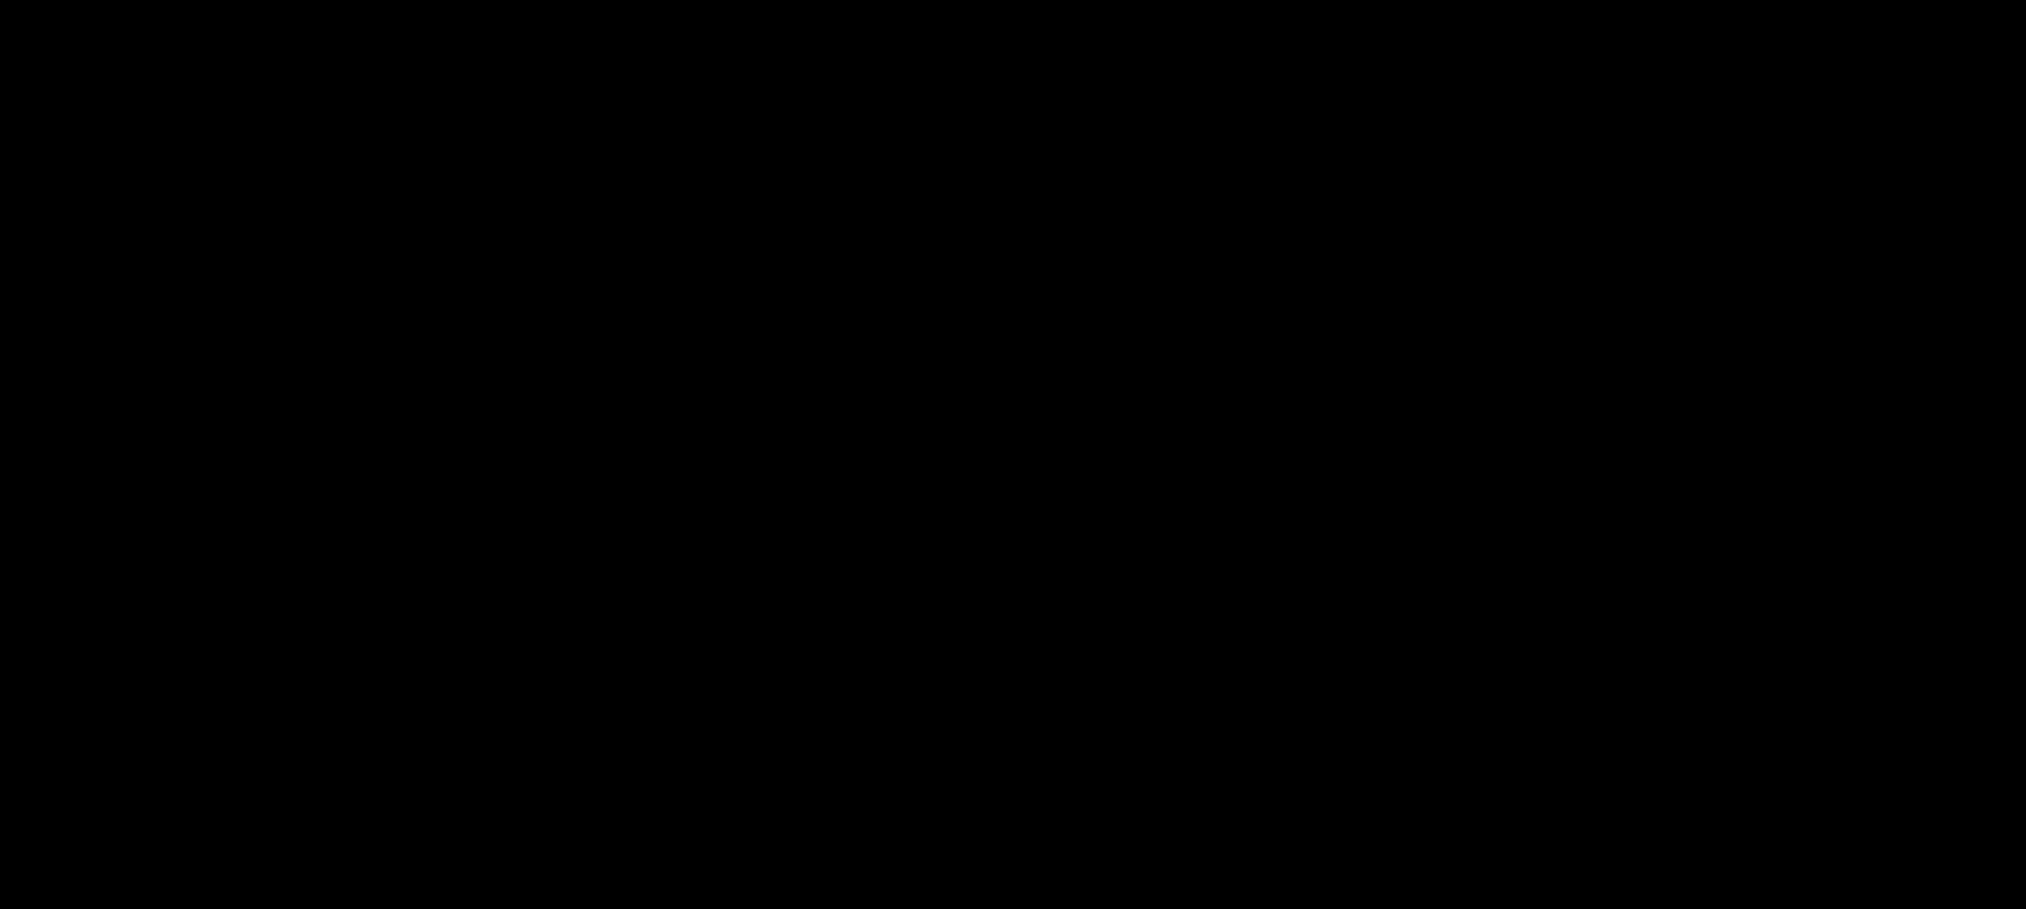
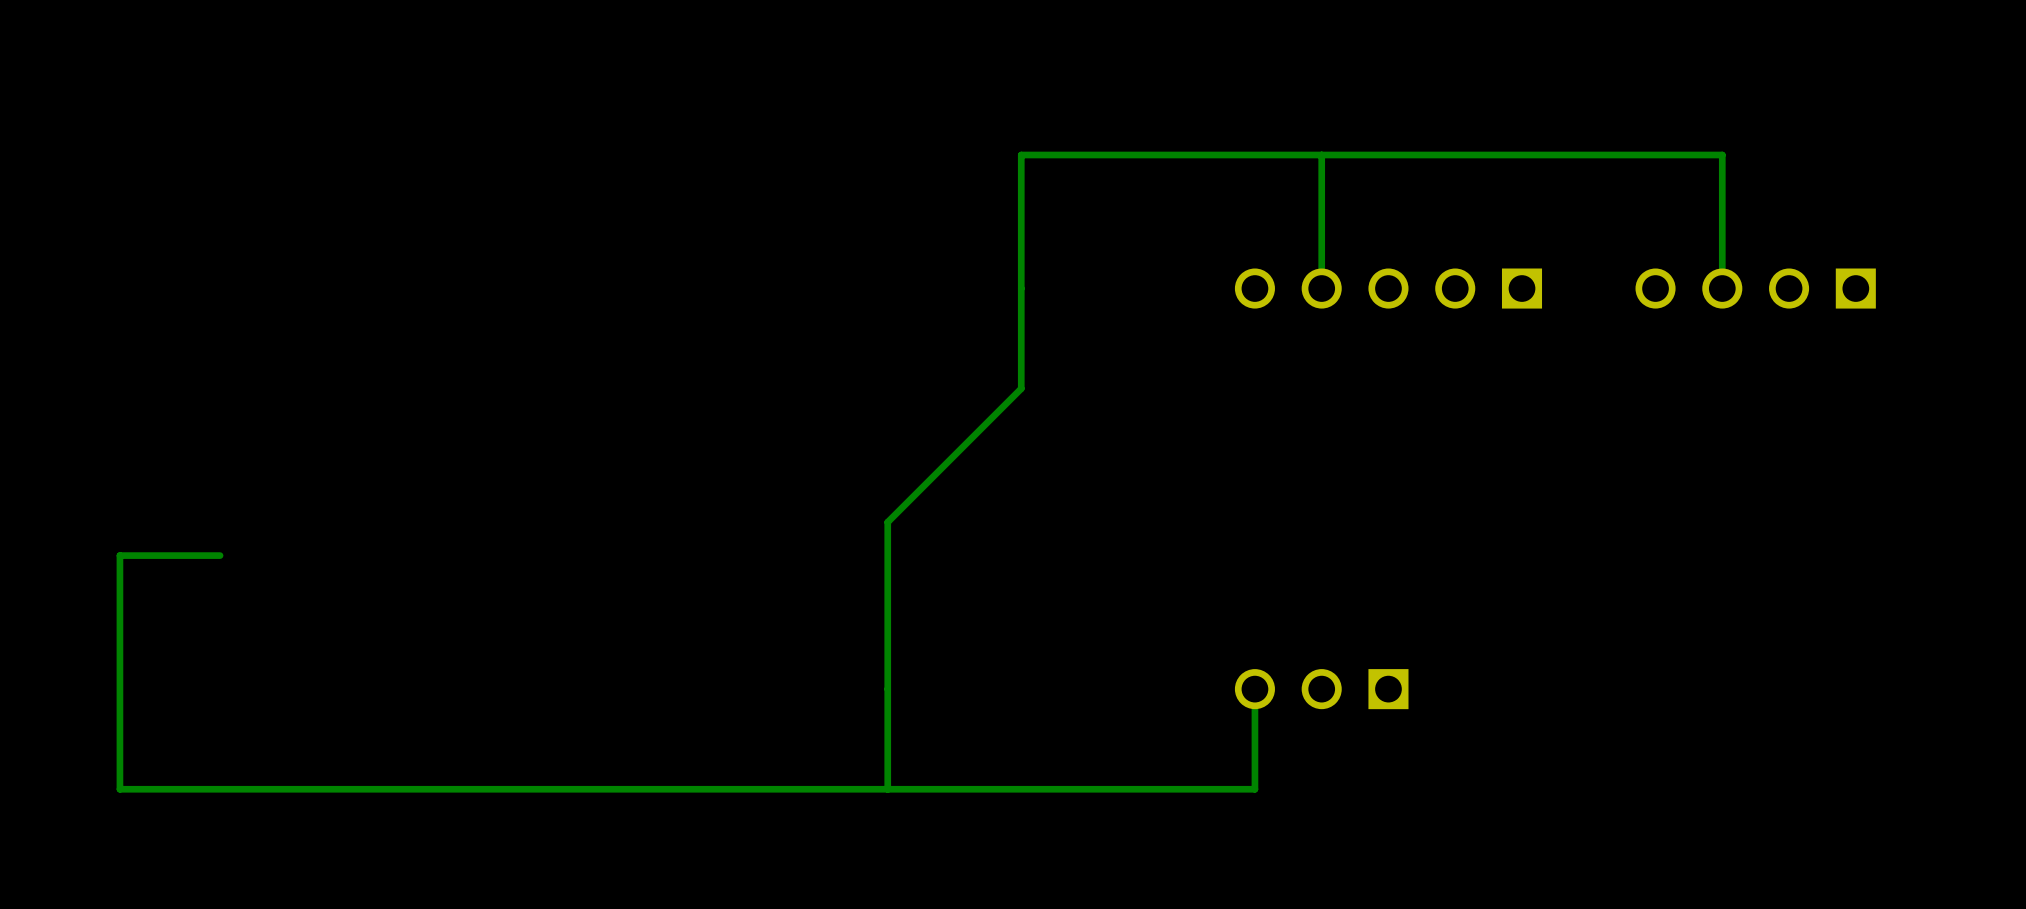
track: none -> (1321, 155) (1321, 288)
part: none -> (1388, 288)
track: none -> (1722, 288) (1722, 155) (1021, 155) (1021, 388) (887, 522) (887, 789)
part: none -> (1755, 288)
track: none -> (220, 555) (119, 555) (119, 789) (1254, 789) (1254, 689)
part: none -> (1321, 689)

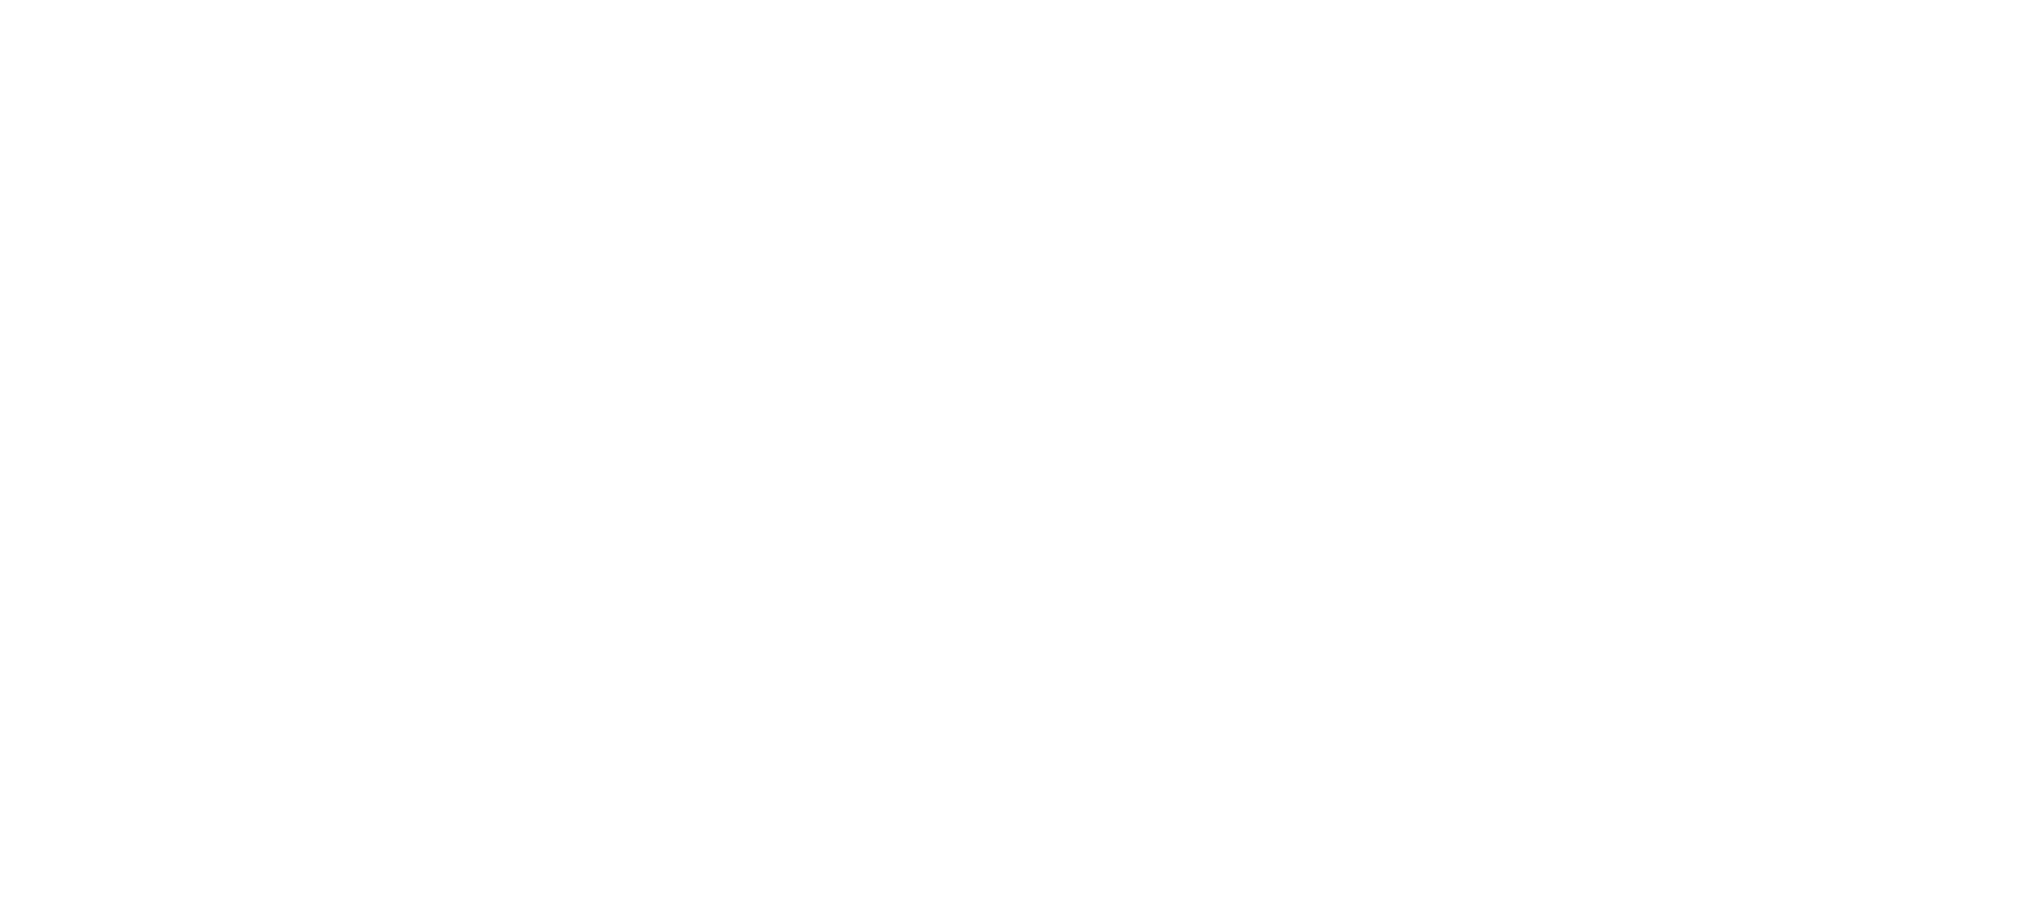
track: (1321, 155) (1321, 288) -> none
part: (1388, 288) -> none
track: (1722, 288) (1722, 155) (1021, 155) (1021, 388) (887, 522) (887, 789) -> none
part: (1755, 288) -> none
track: (220, 555) (119, 555) (119, 789) (1254, 789) (1254, 689) -> none
part: (1321, 689) -> none

